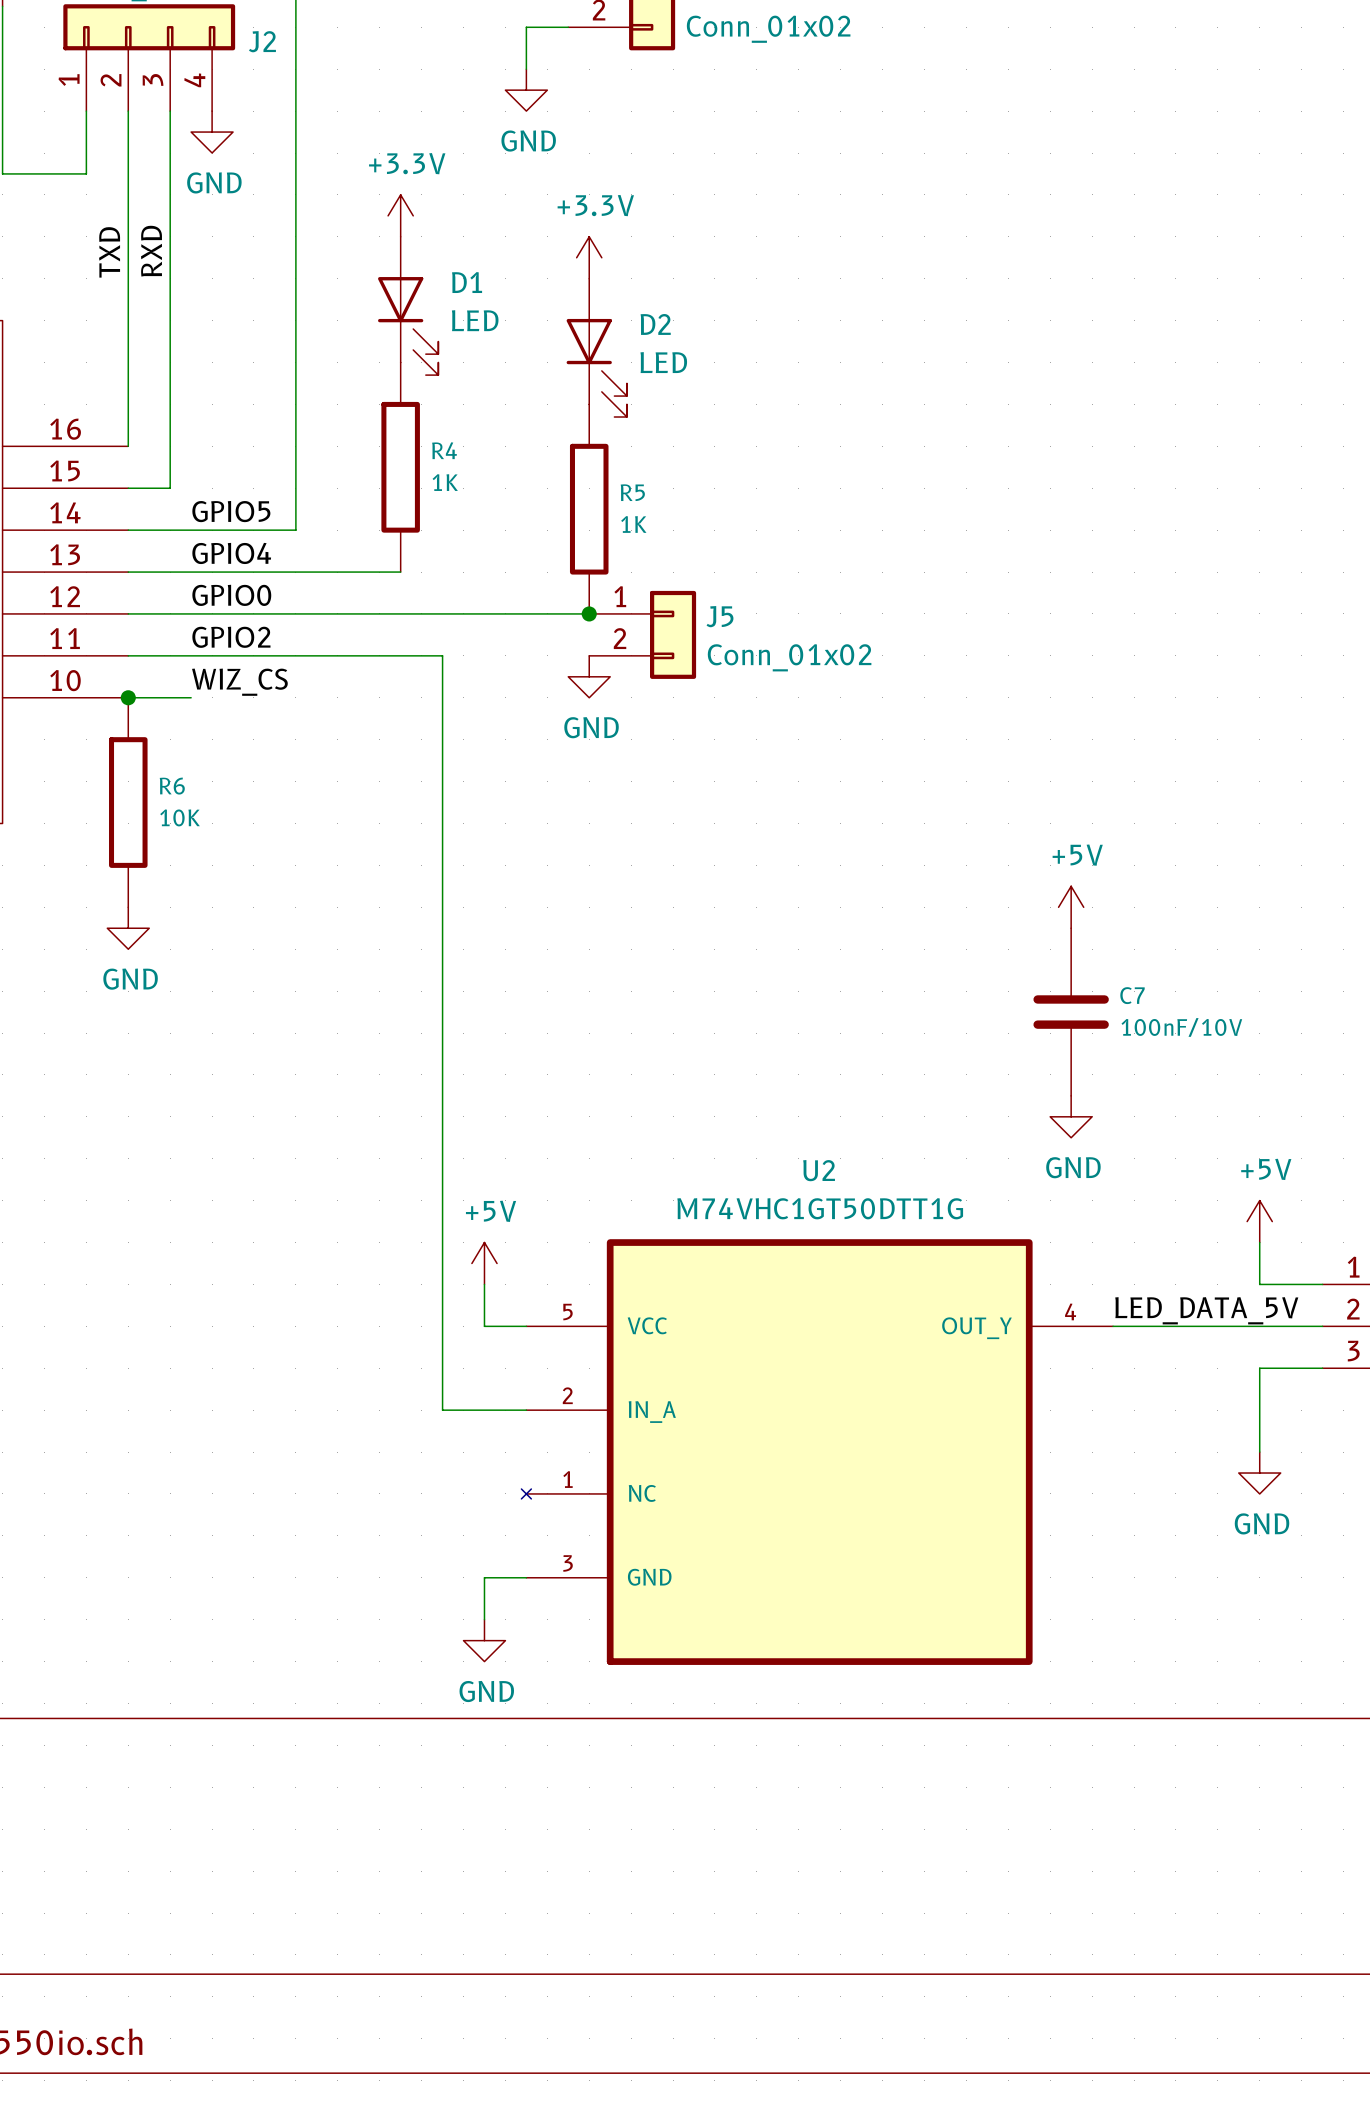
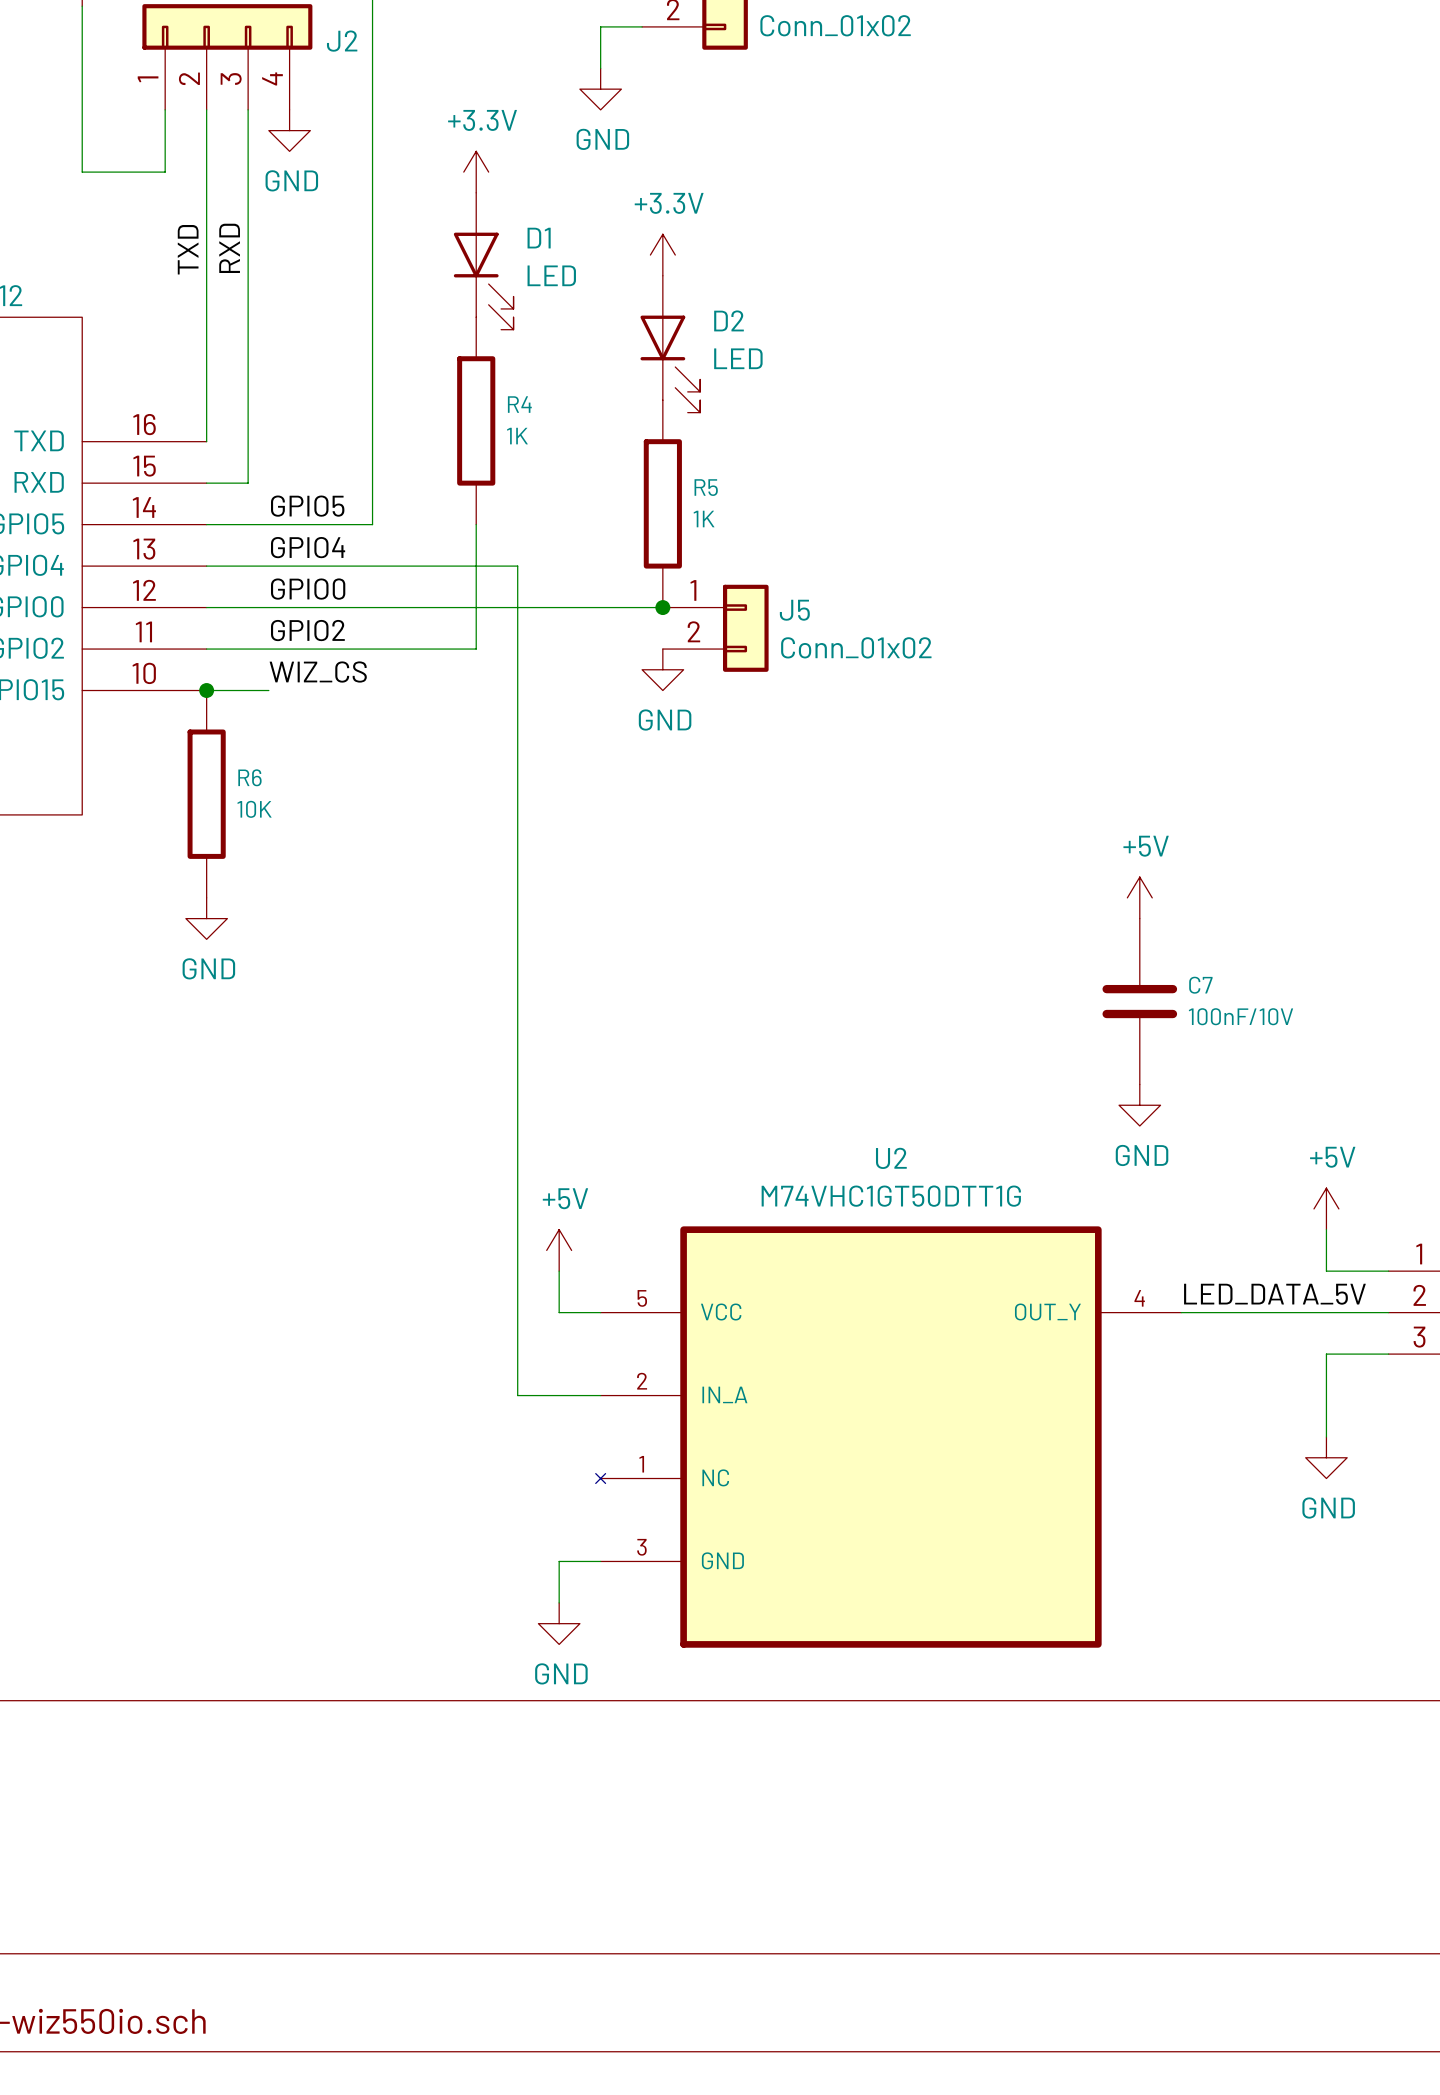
power symbol position: +3.3V (400, 215) -> +3.3V (476, 172)
D1 position: (408, 305) -> (483, 261)
R4 position: (400, 467) -> (476, 420)
wire: none -> (476, 524) (476, 649)
wire: (400, 655) (442, 655) -> (476, 566) (517, 566) (517, 649)

